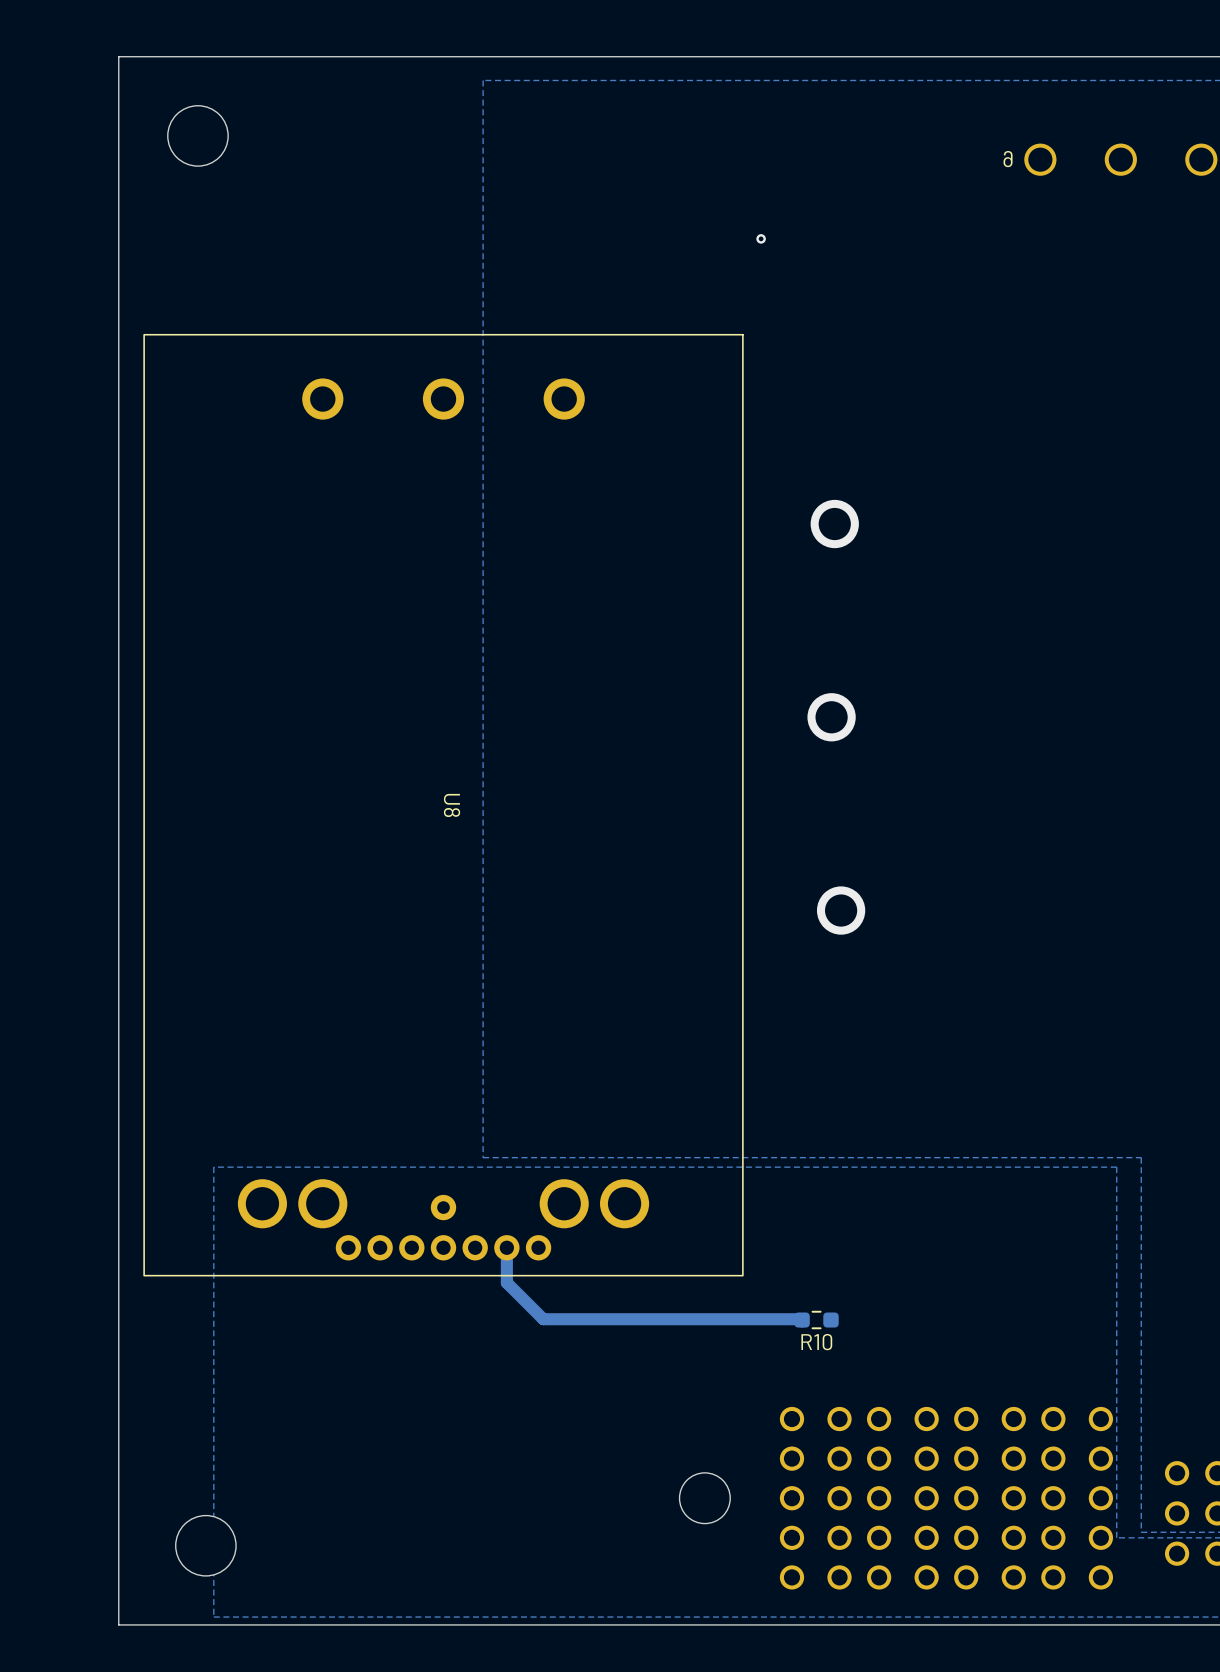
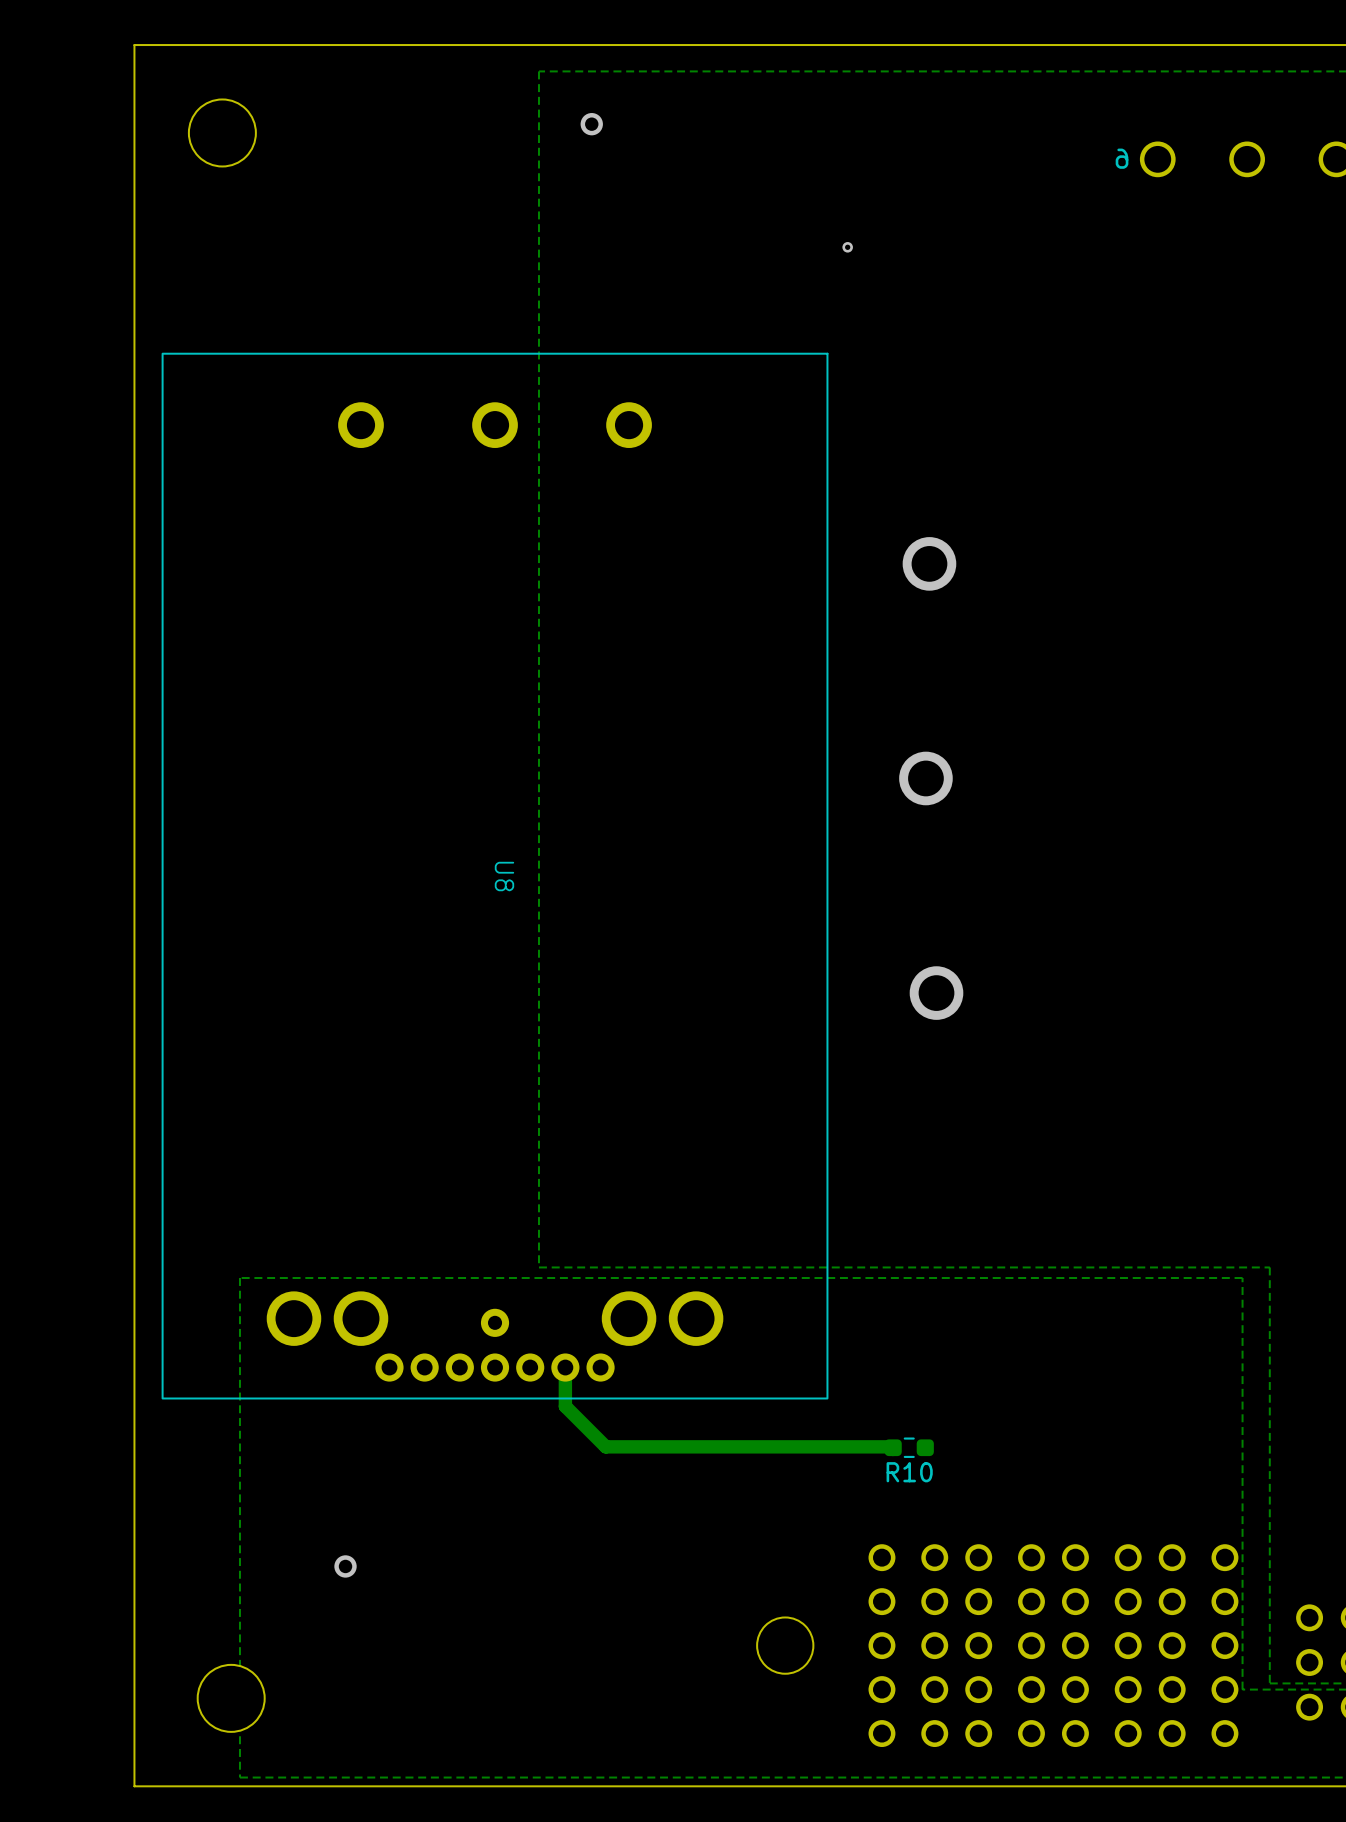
via: none -> (591, 124)
via: none -> (345, 1566)

